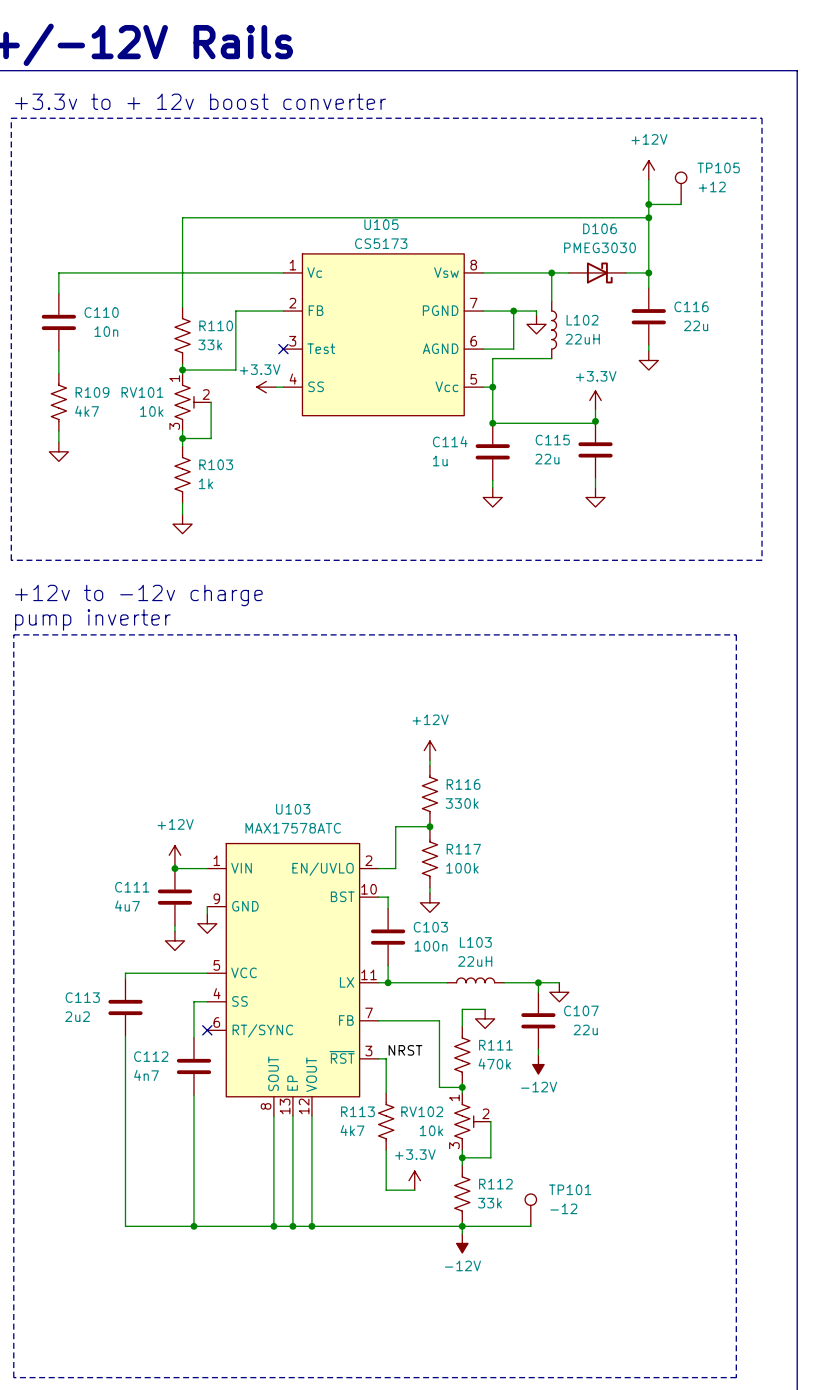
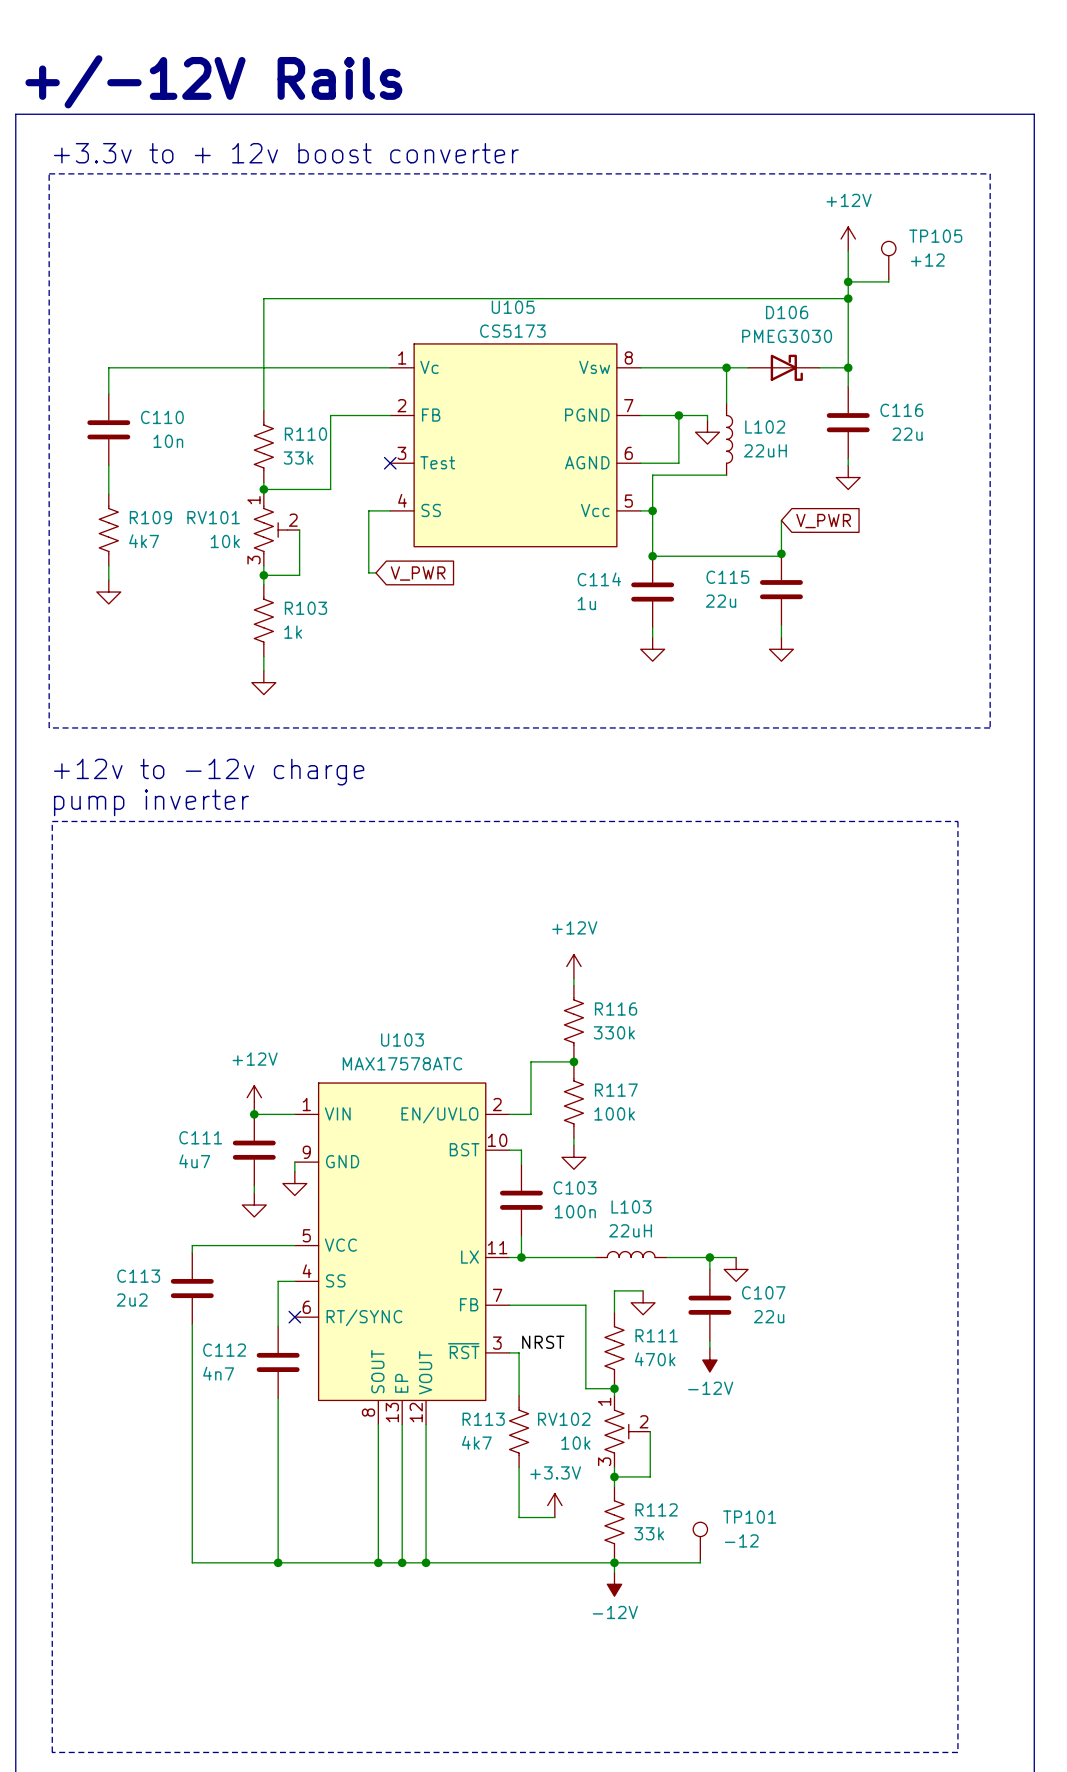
power symbol: +3.3V (266, 387) -> none
wire: none -> (380, 510) (368, 510) (368, 572) (375, 572)
global label: none -> V_PWR (823, 521)
power symbol: +3.3V (595, 400) -> none
global label: none -> V_PWR (418, 573)

